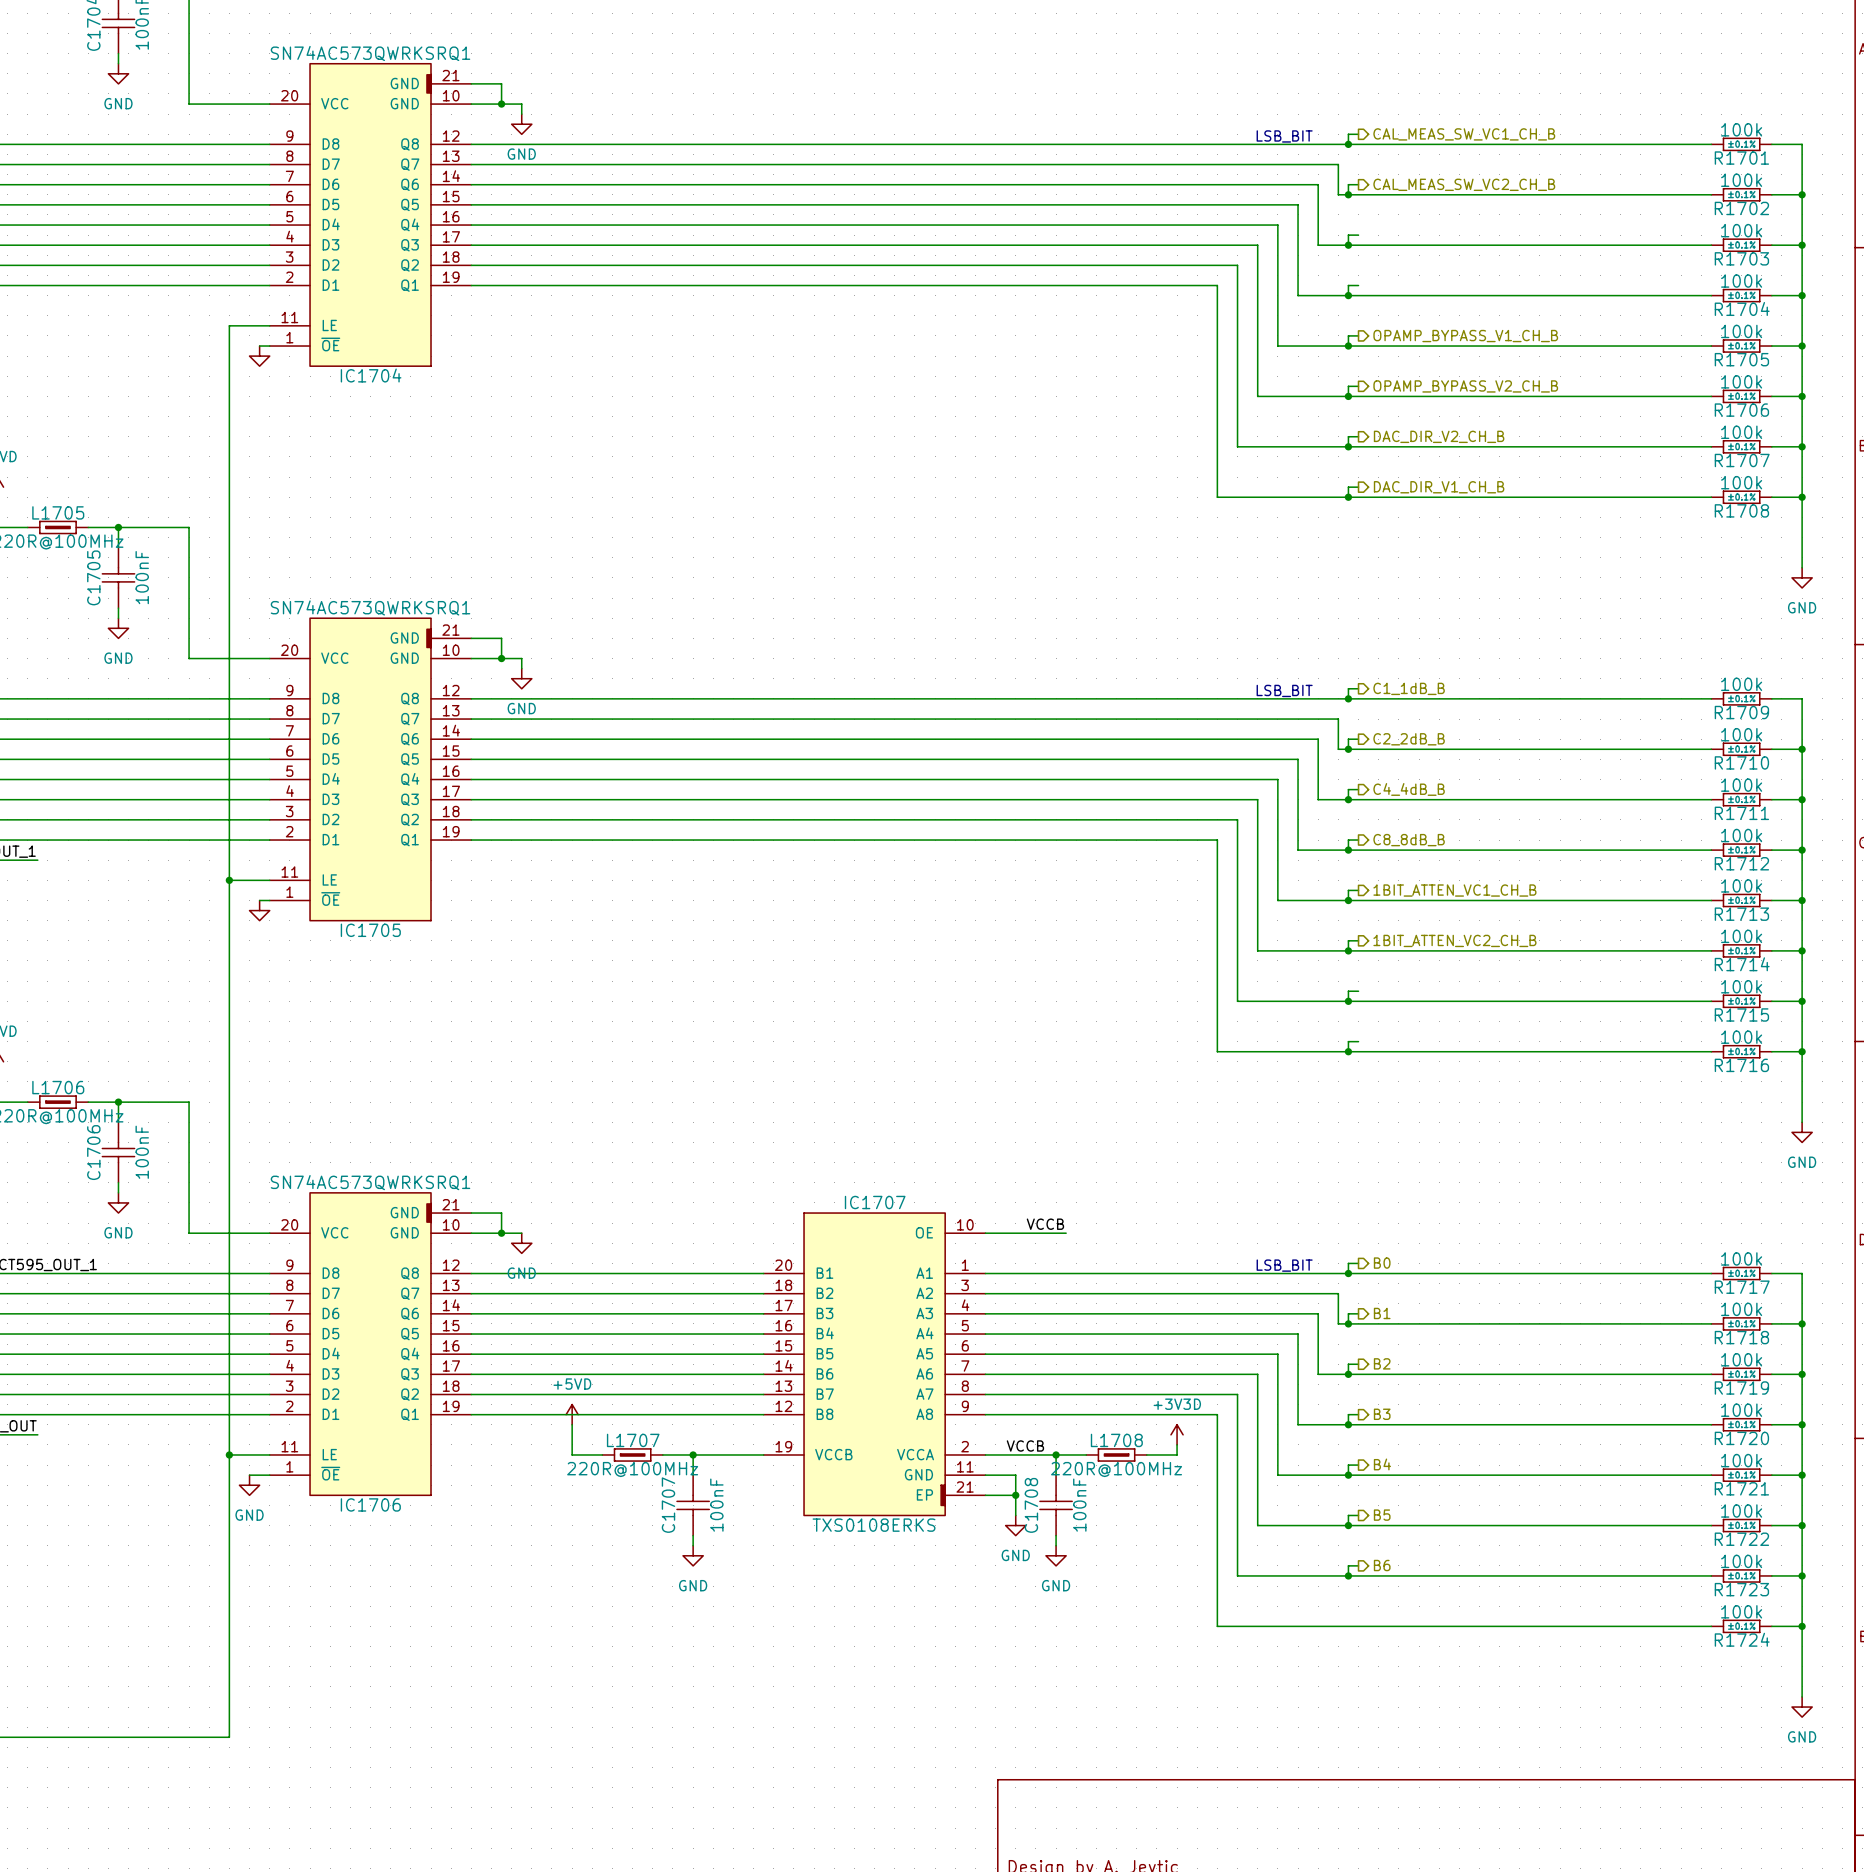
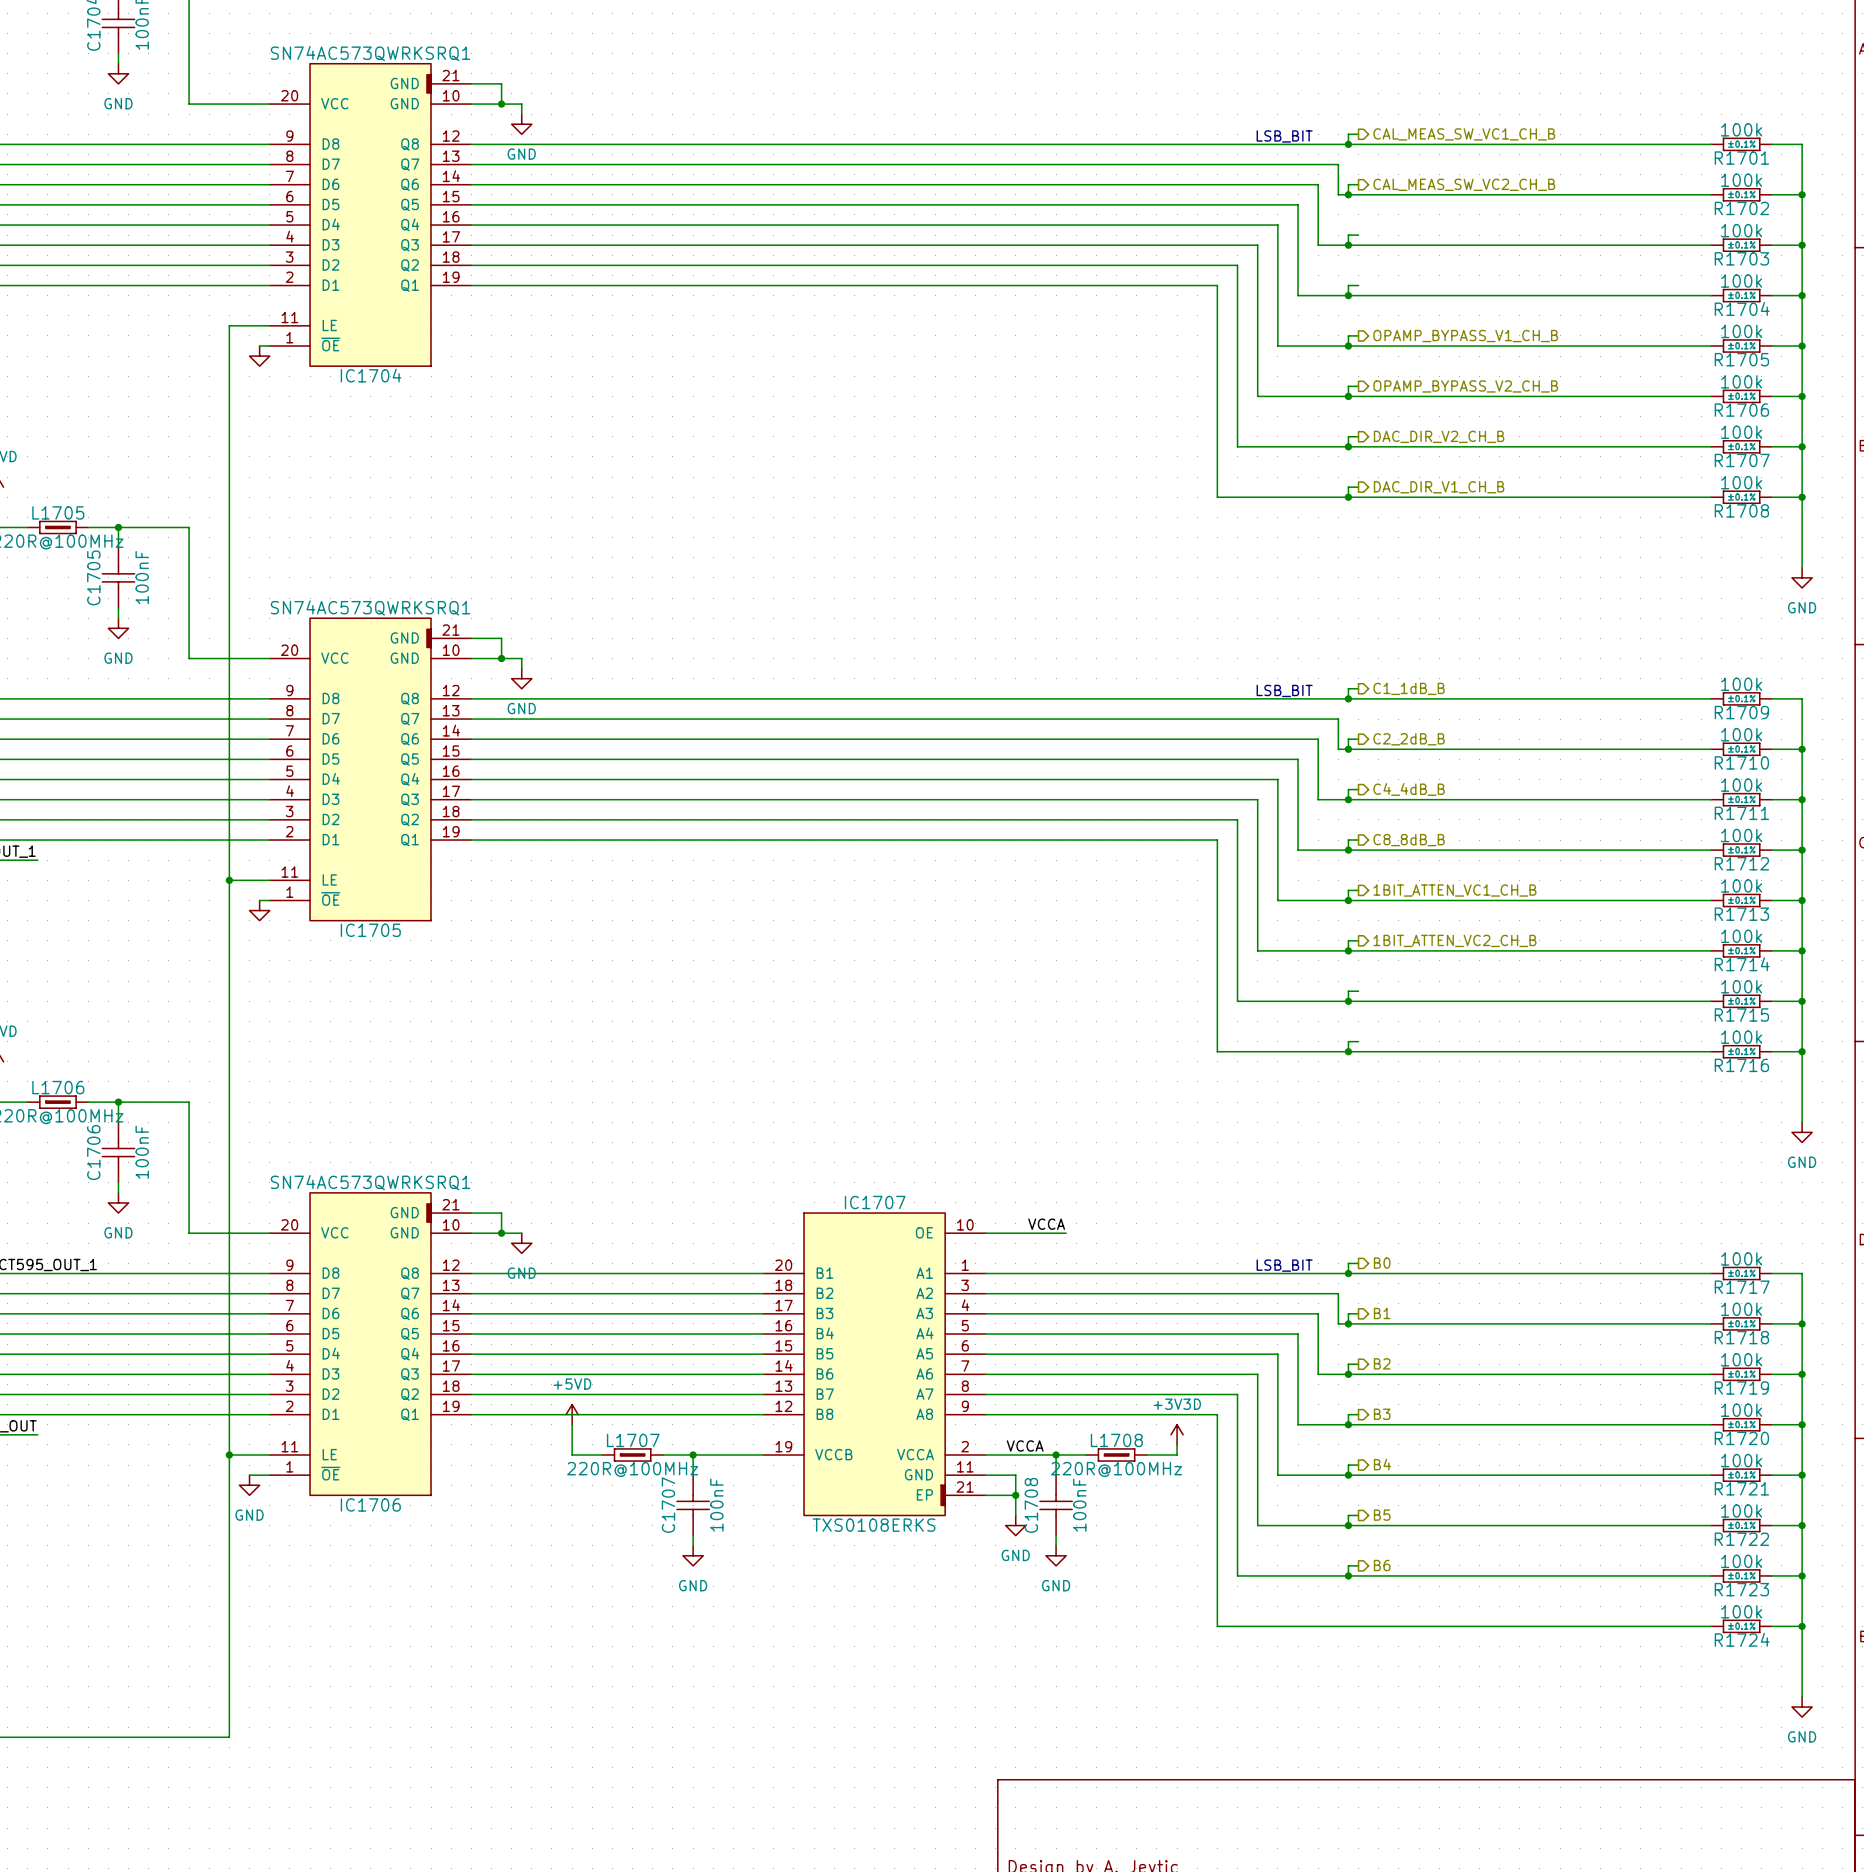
label: VCCB (1045, 1224) -> VCCA (1046, 1224)
label: VCCB (1025, 1445) -> VCCA (1025, 1445)

